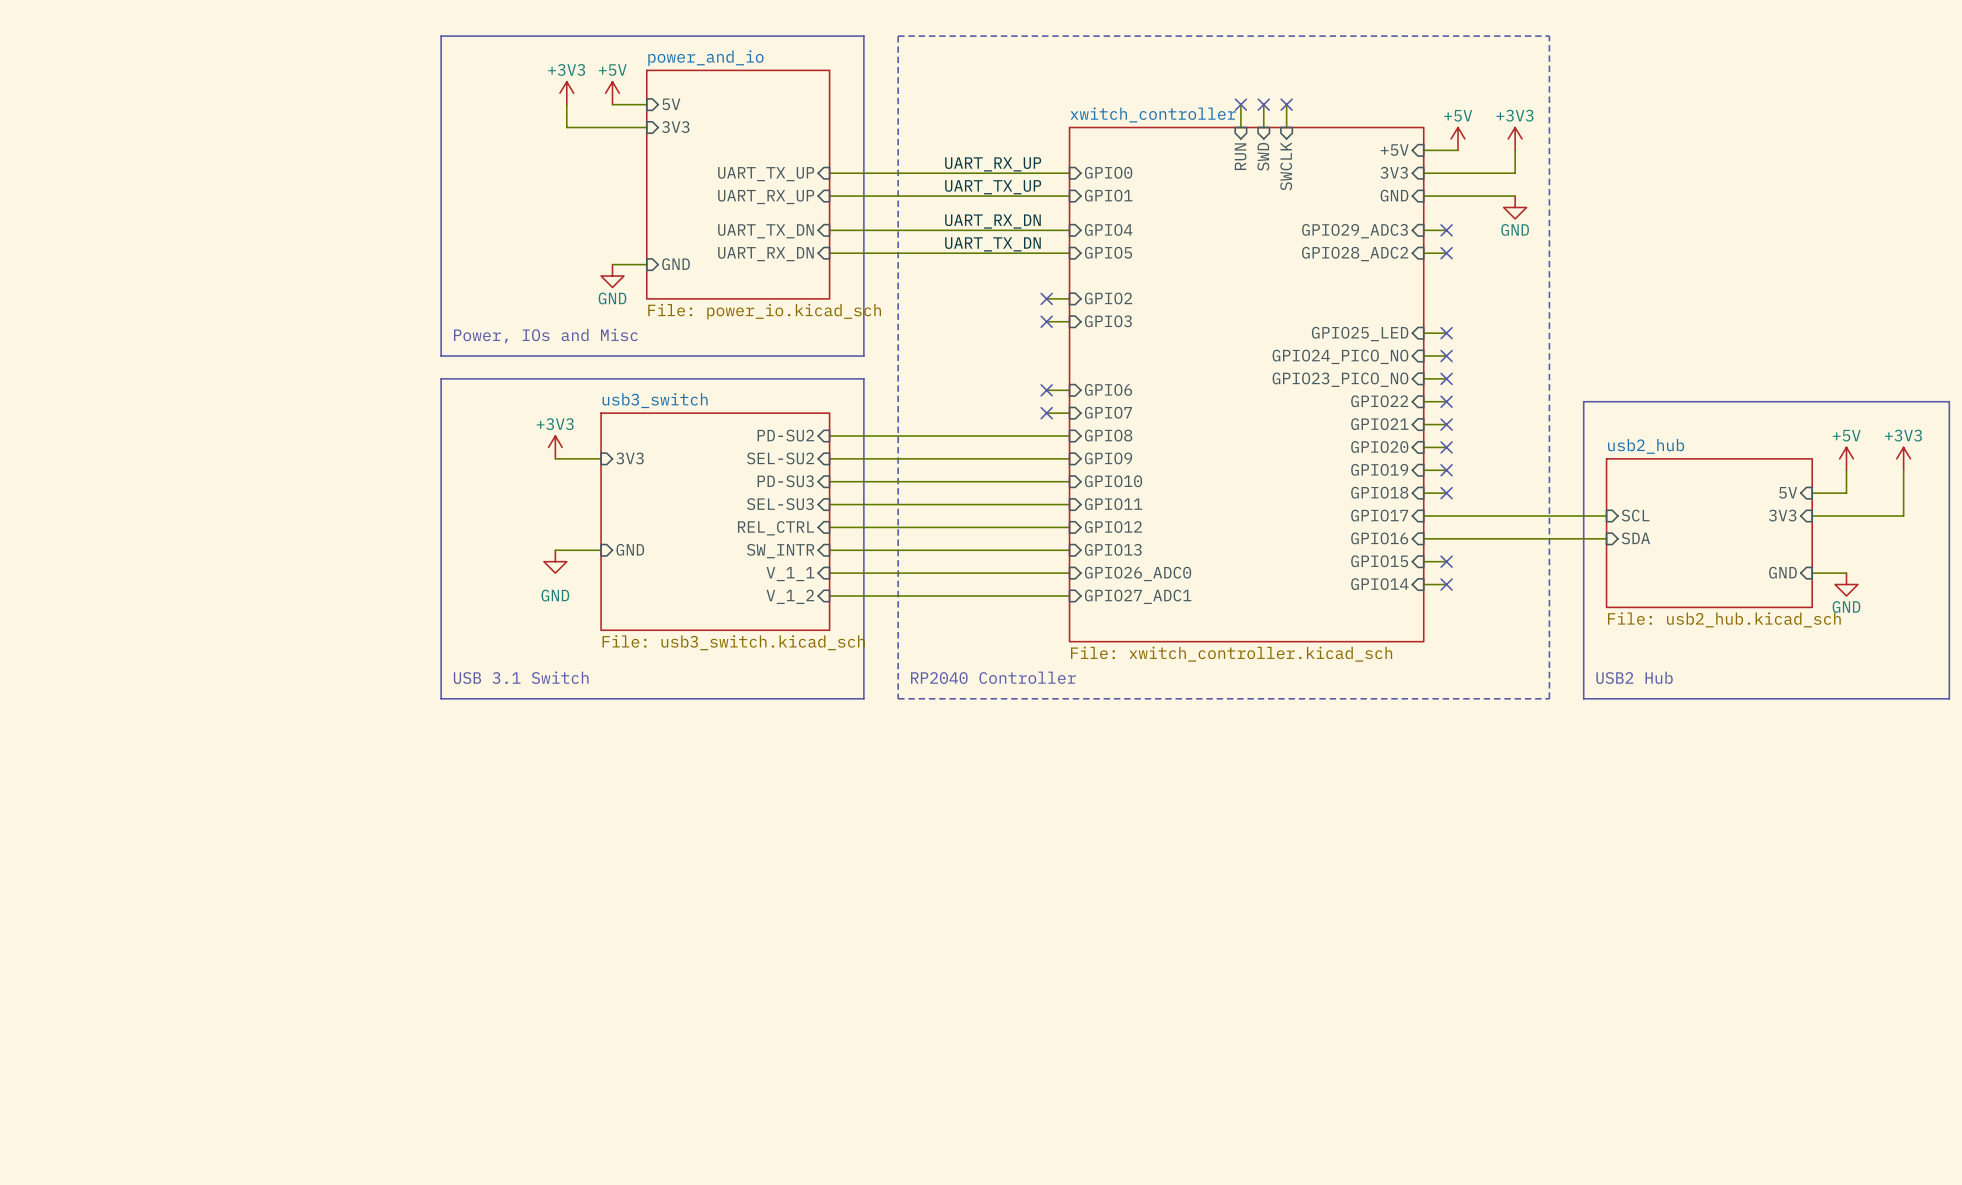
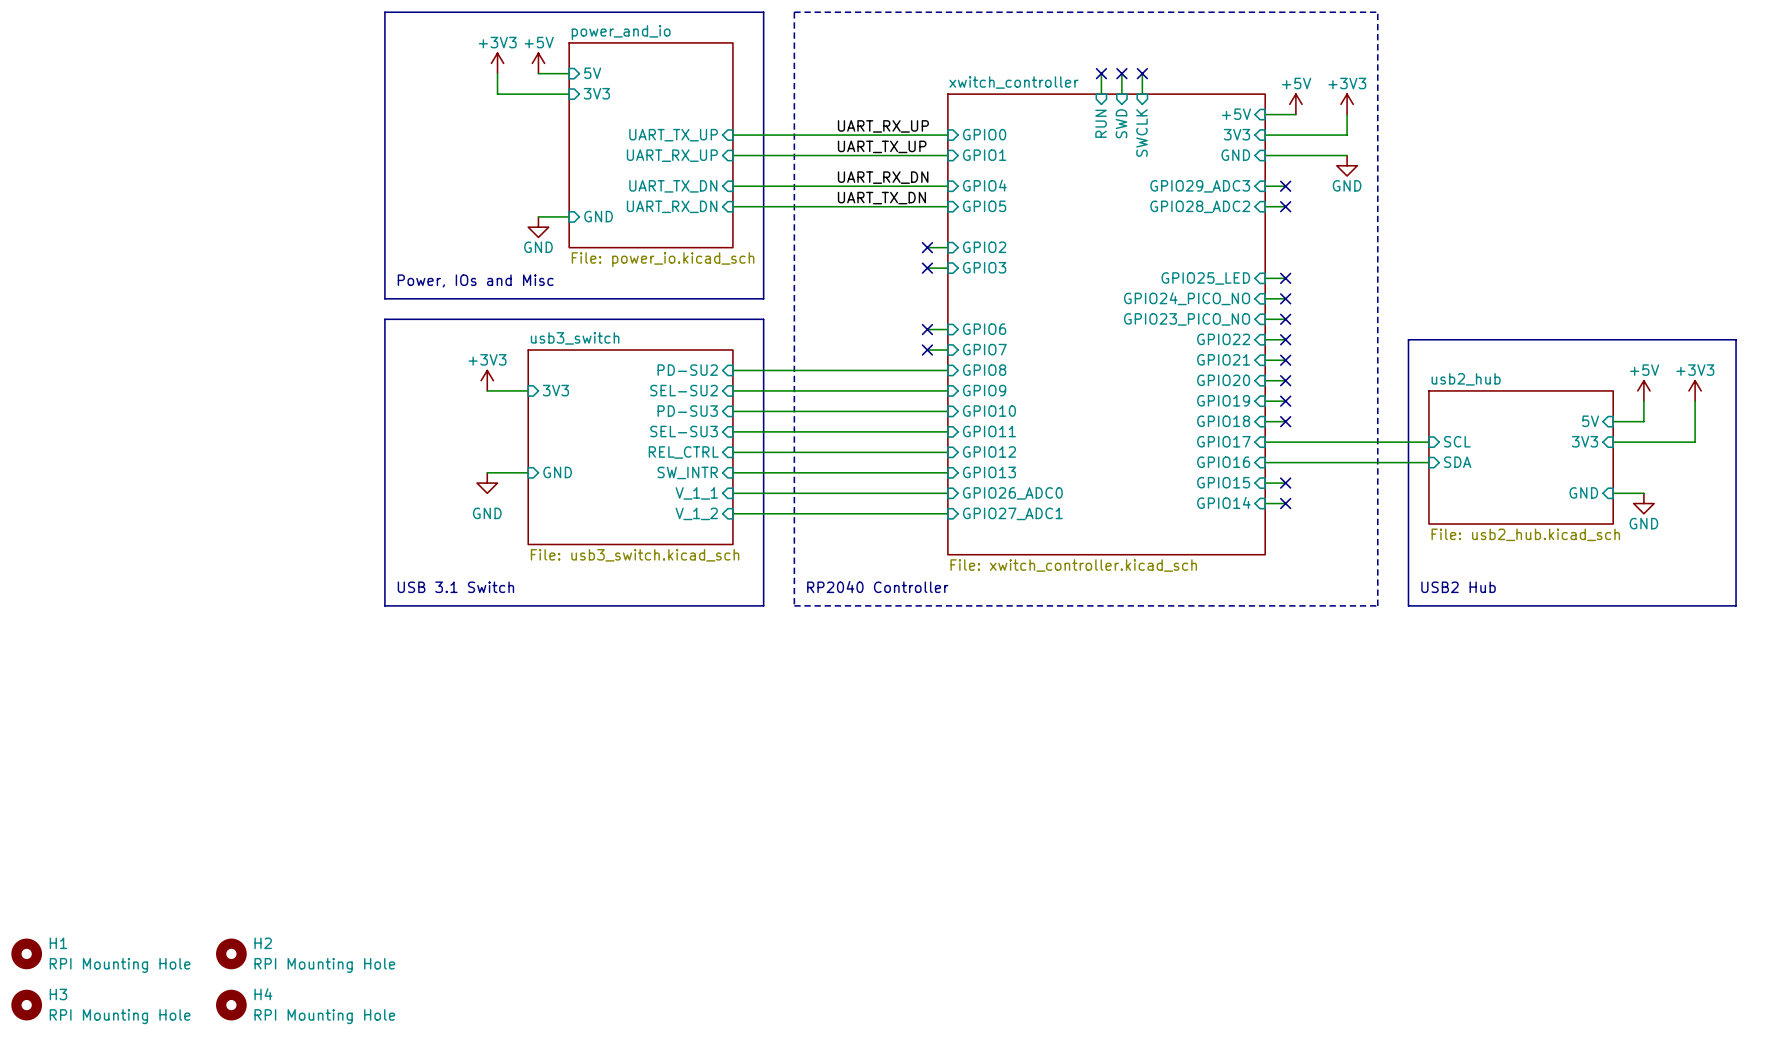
H1: none -> RPI Mounting Hole (26, 953)
H2: none -> RPI Mounting Hole (231, 953)
H3: none -> RPI Mounting Hole (26, 1005)
H4: none -> RPI Mounting Hole (231, 1005)

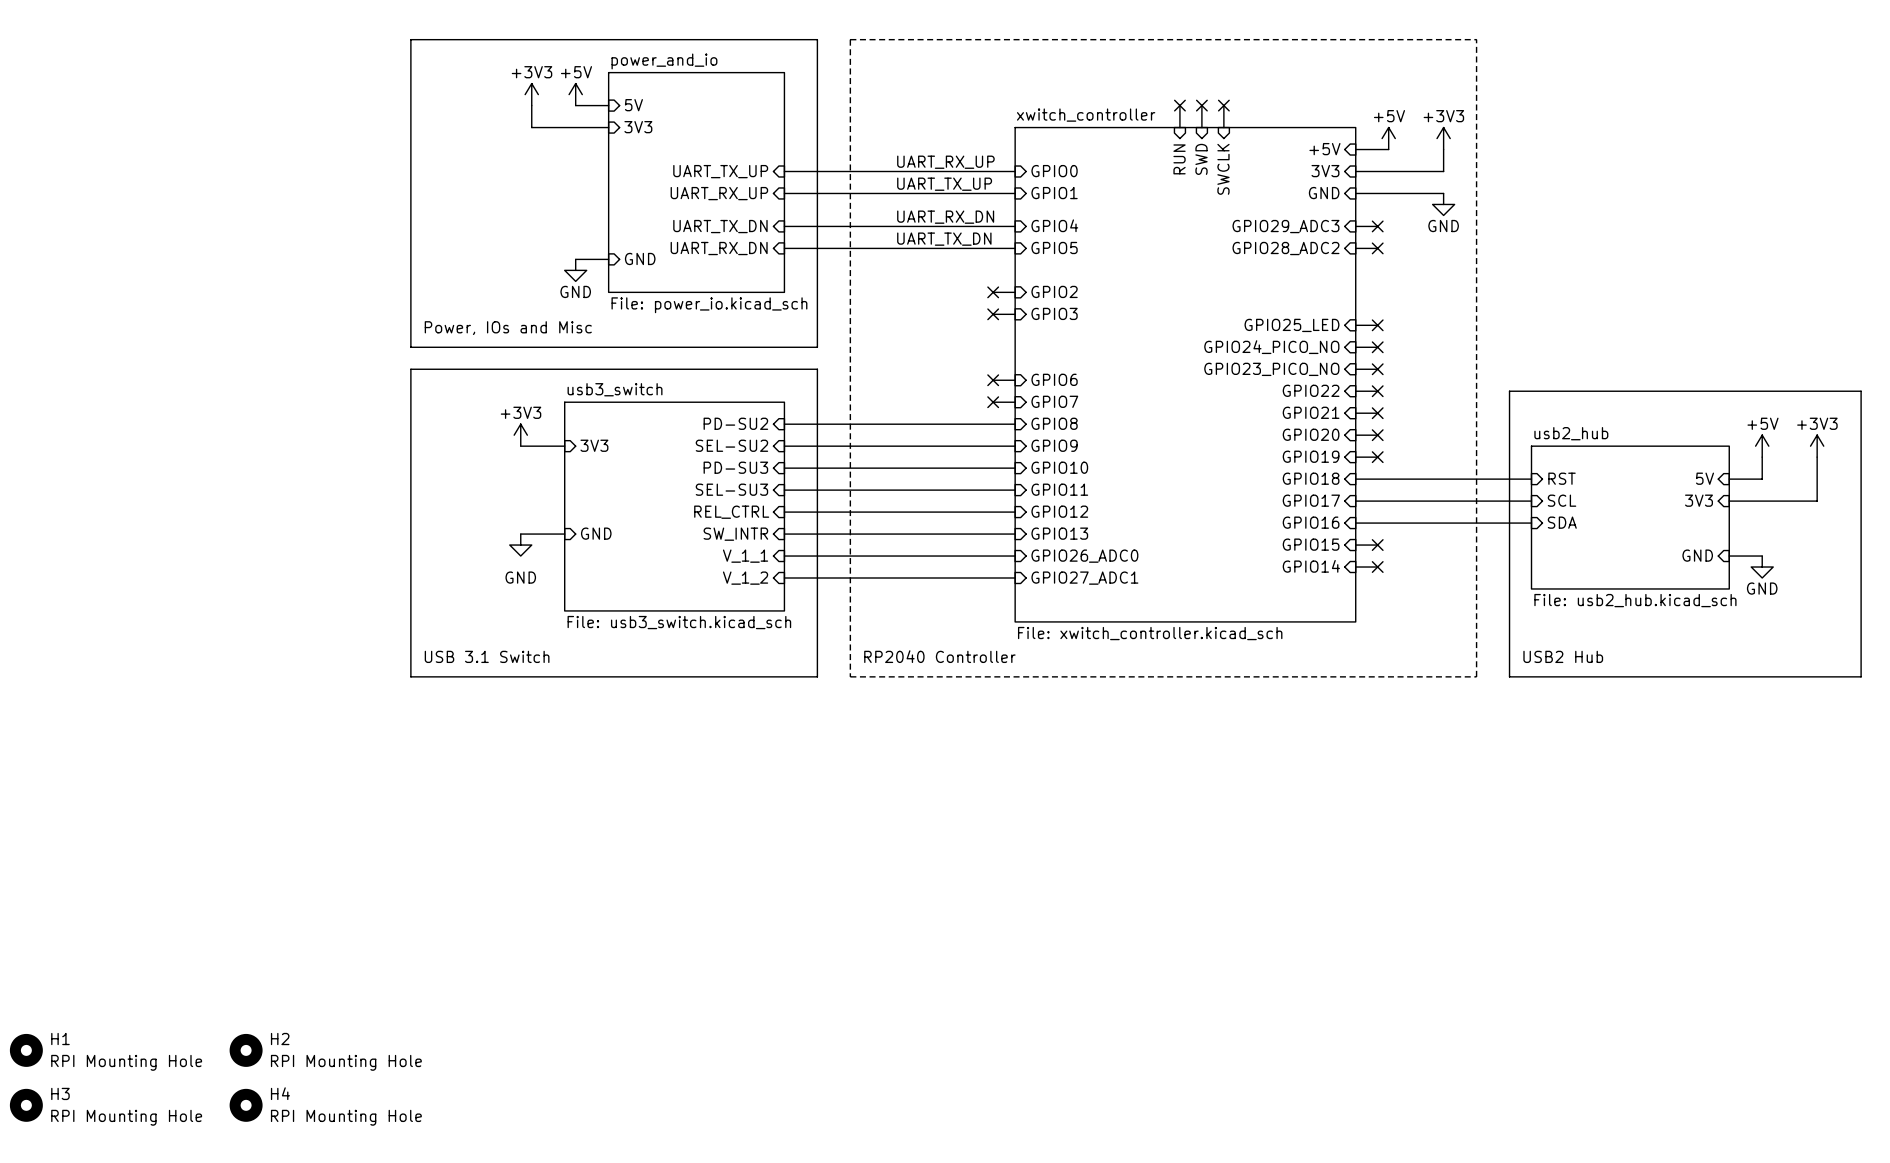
wire: none -> (1377, 479) (1531, 479)
no-connect mark: (1285, 421) -> none
sheet pin: none -> RST (1562, 478)

